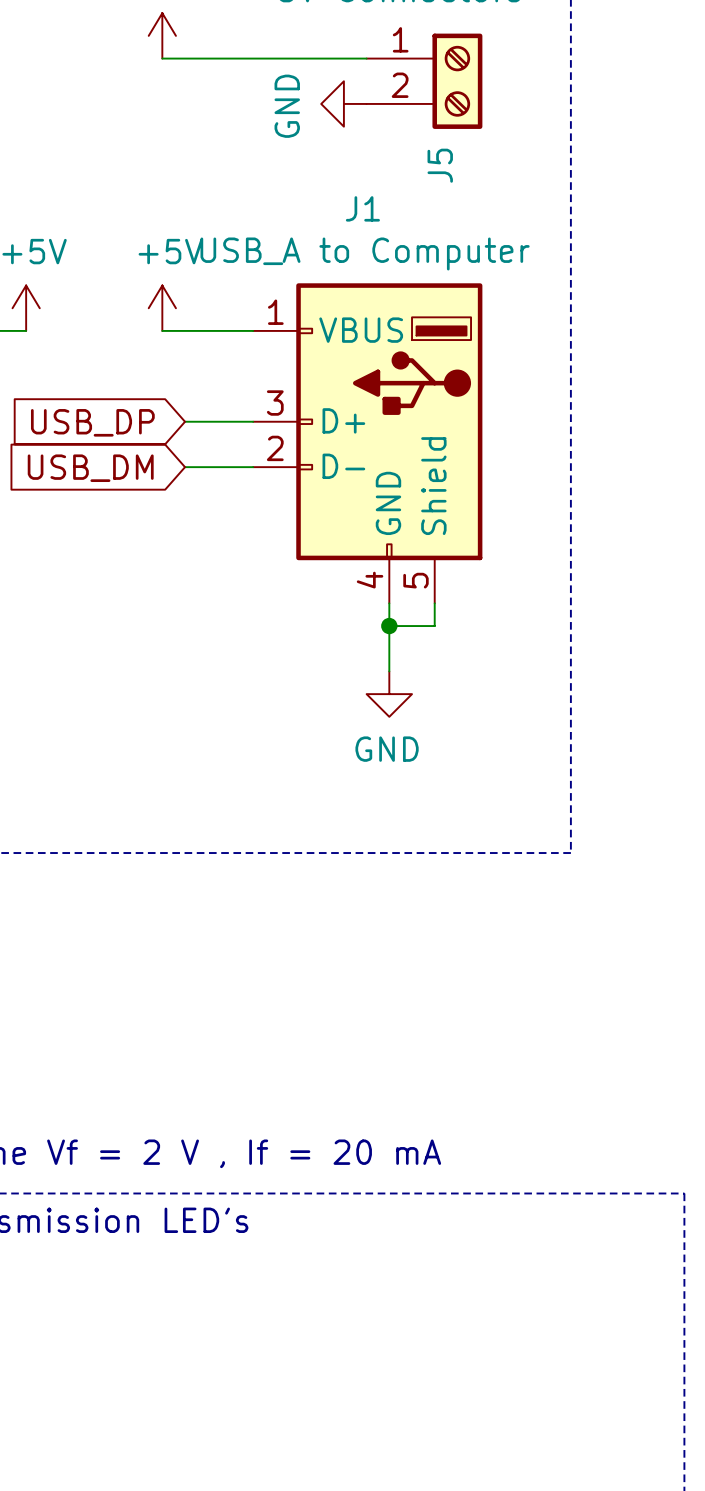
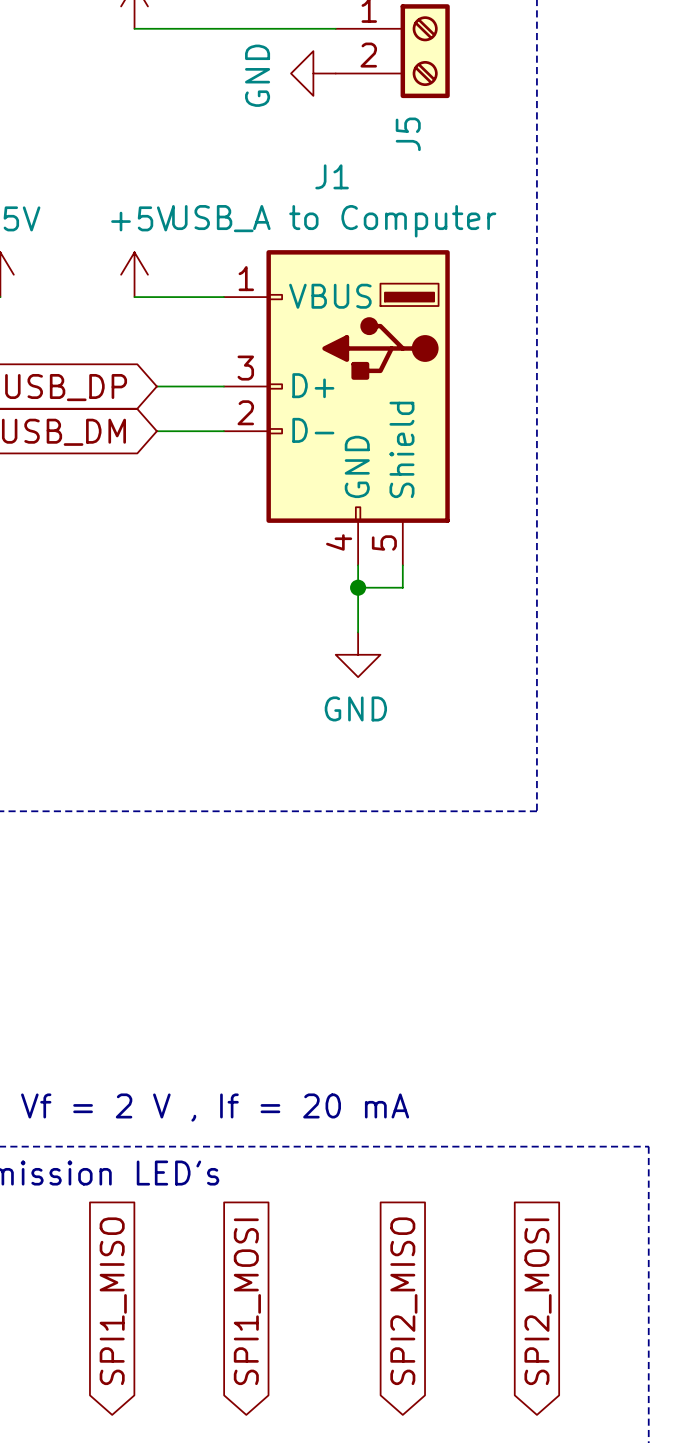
global label: none -> SPI1_MISO (113, 1301)
global label: none -> SPI1_MOSI (247, 1301)
global label: none -> SPI2_MISO (403, 1301)
global label: none -> SPI2_MOSI (538, 1301)

